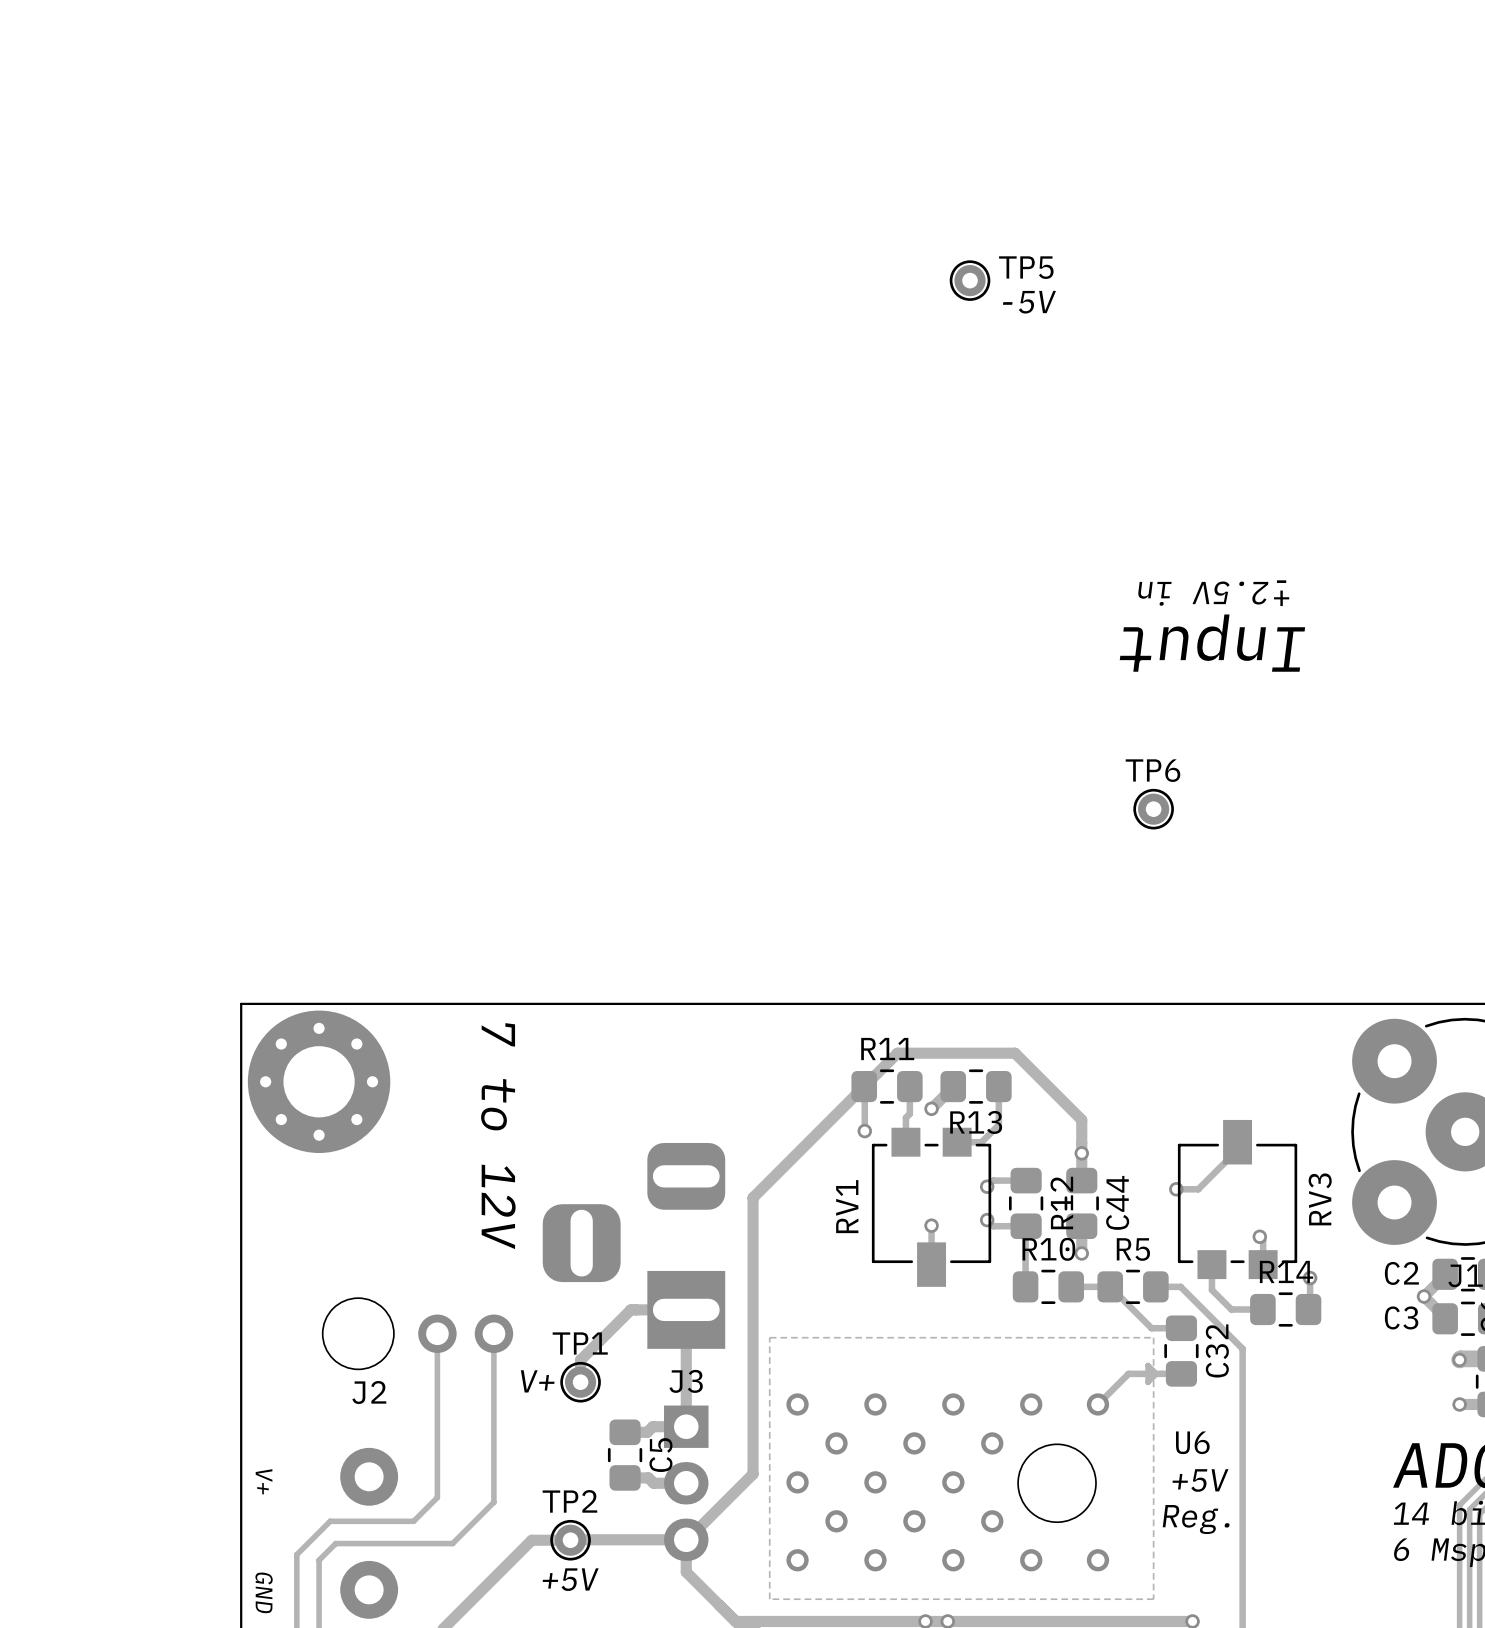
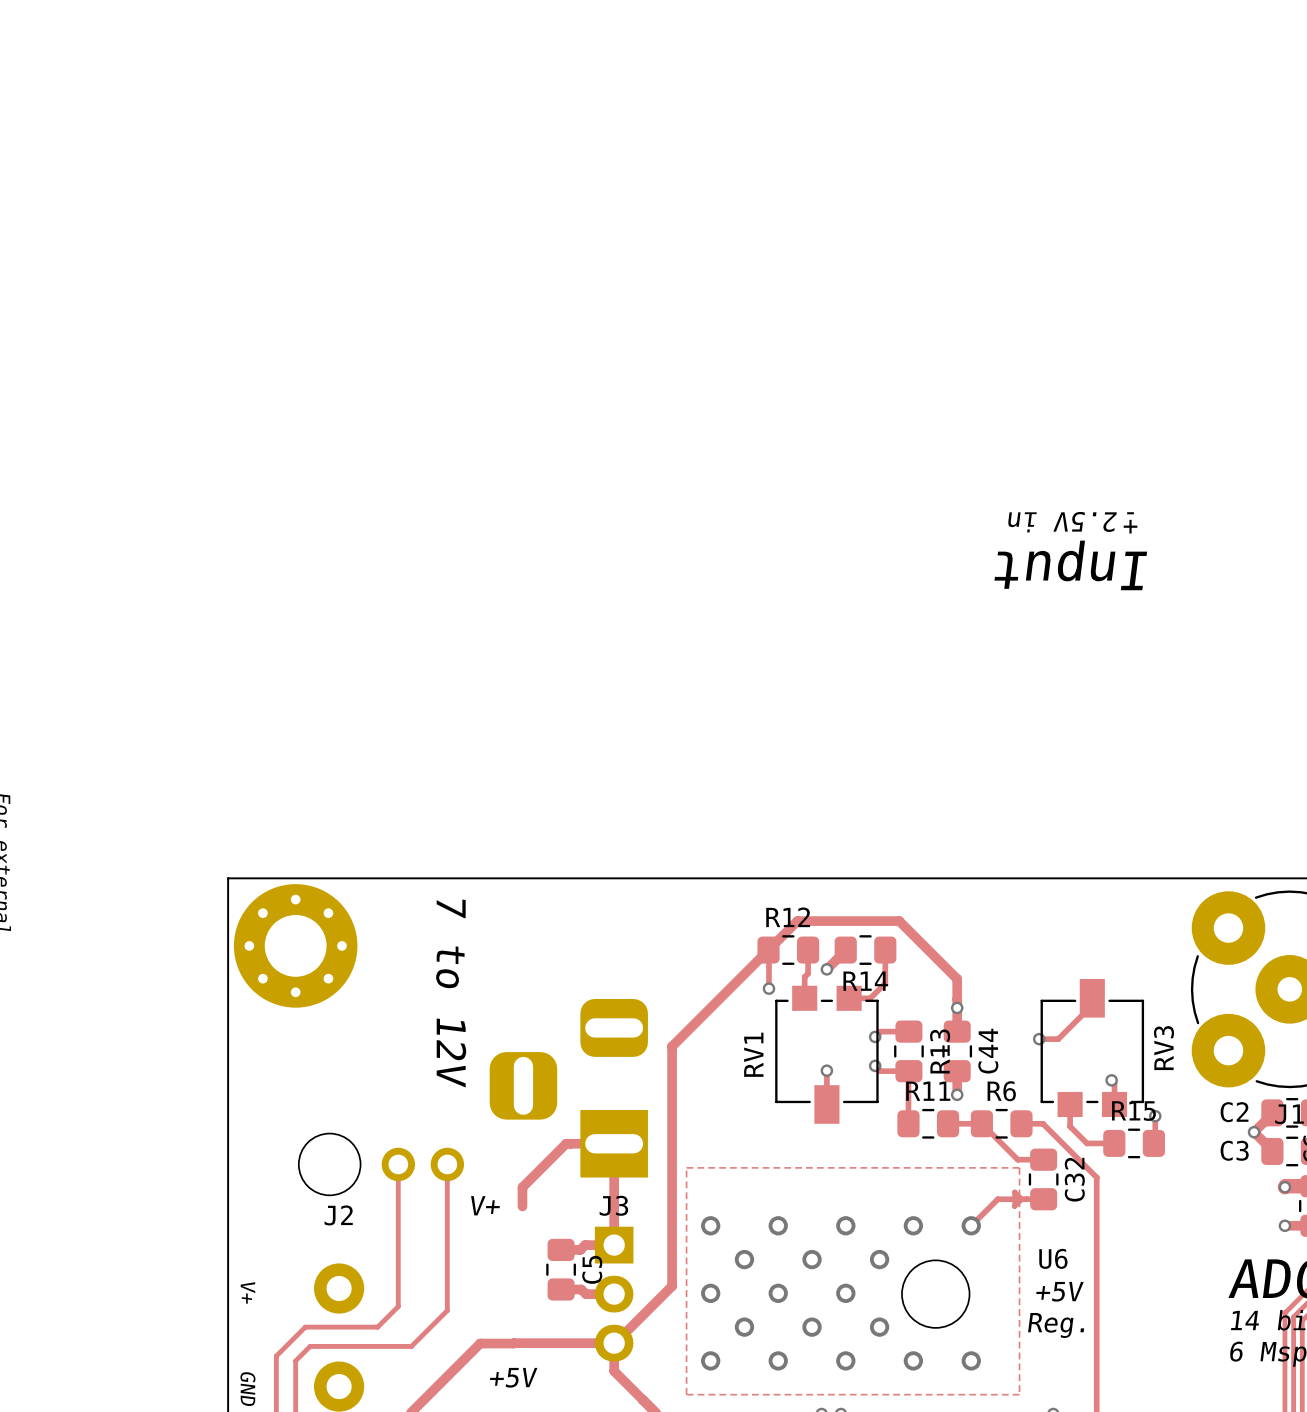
TP5: (970, 280) -> none
text: -5V (1029, 302) -> none
TP6: (1153, 809) -> none
R11 name: R11 (887, 1049) -> R12 (788, 917)
R13 name: R13 (976, 1122) -> R14 (865, 981)
R12 name: R12 (1061, 1202) -> R13 (940, 1051)
R10 name: R10 (1048, 1249) -> R11 (928, 1091)
R5 name: R5 (1133, 1249) -> R6 (1001, 1091)
R14 name: R14 (1286, 1271) -> R15 (1133, 1111)
TP1: (580, 1382) -> none
TP2: (570, 1540) -> none

